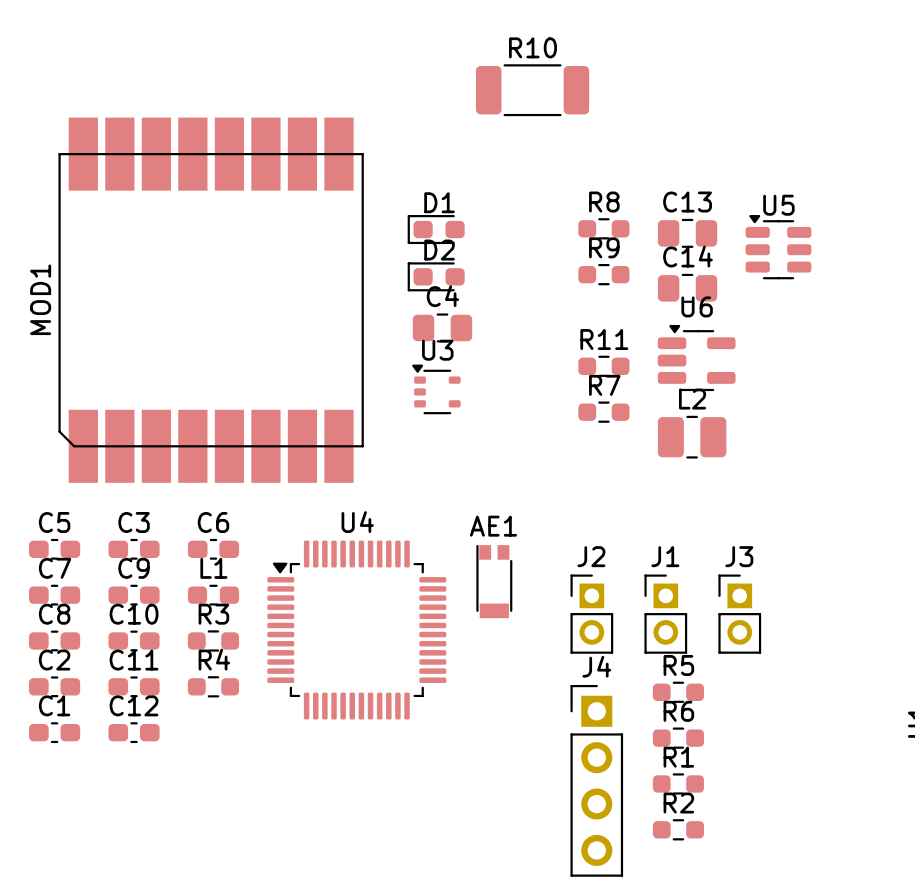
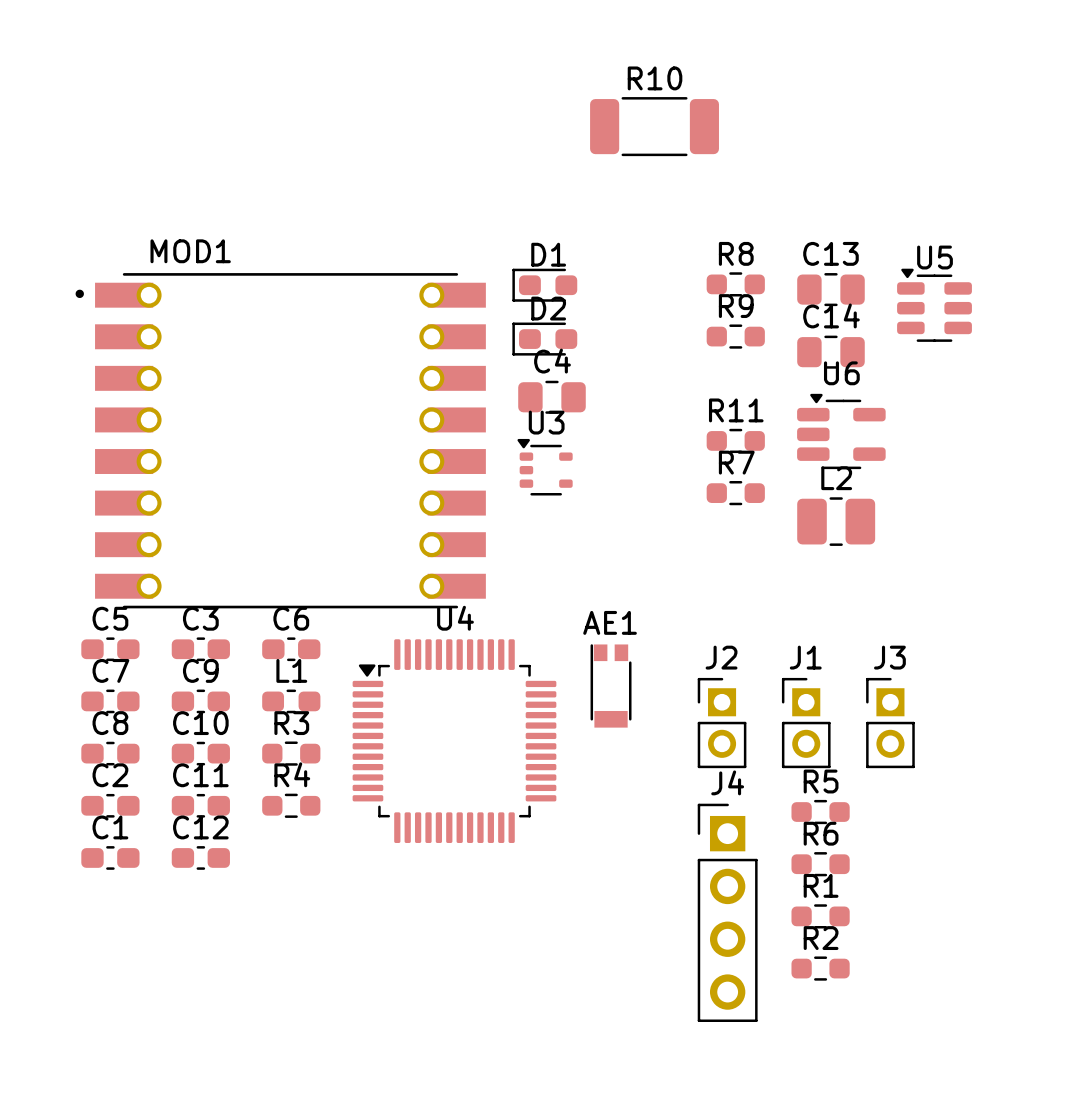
MOD1 footprint: [58, 117, 364, 483] -> [75, 273, 486, 609]
MOD1 name position: MOD1 (40, 299) -> MOD1 (190, 251)

